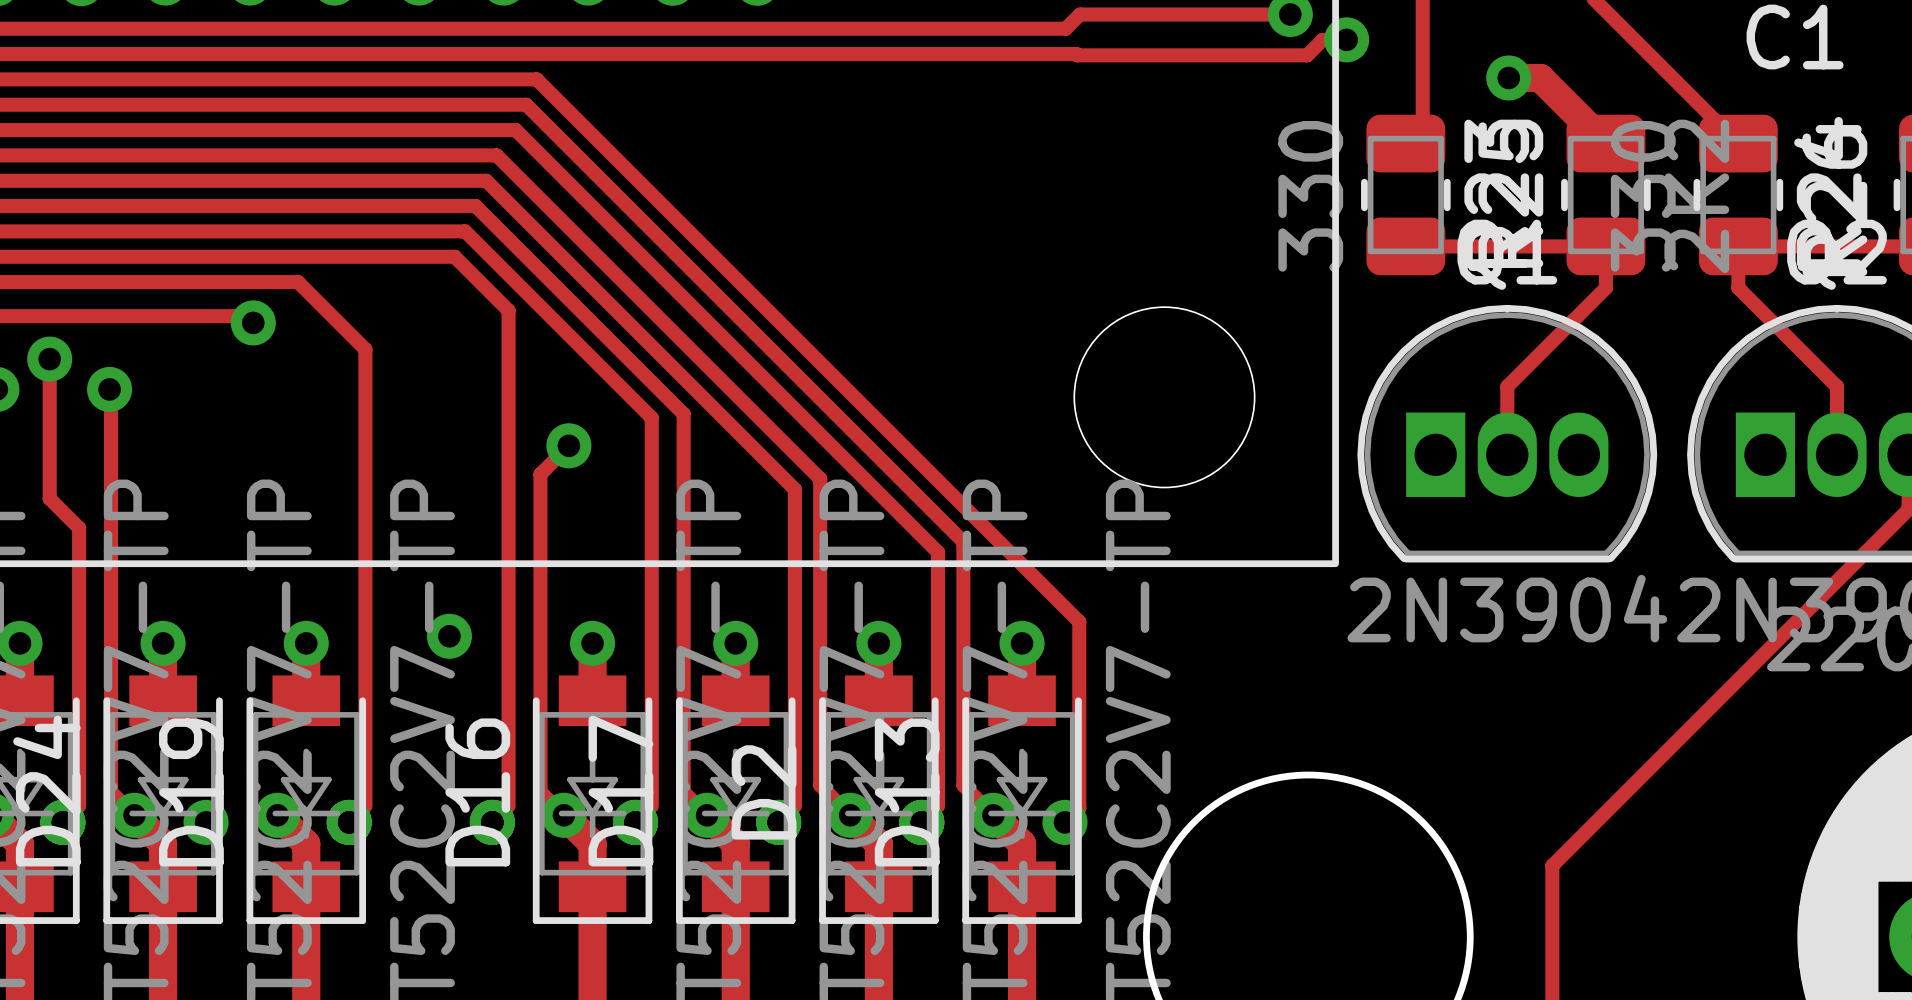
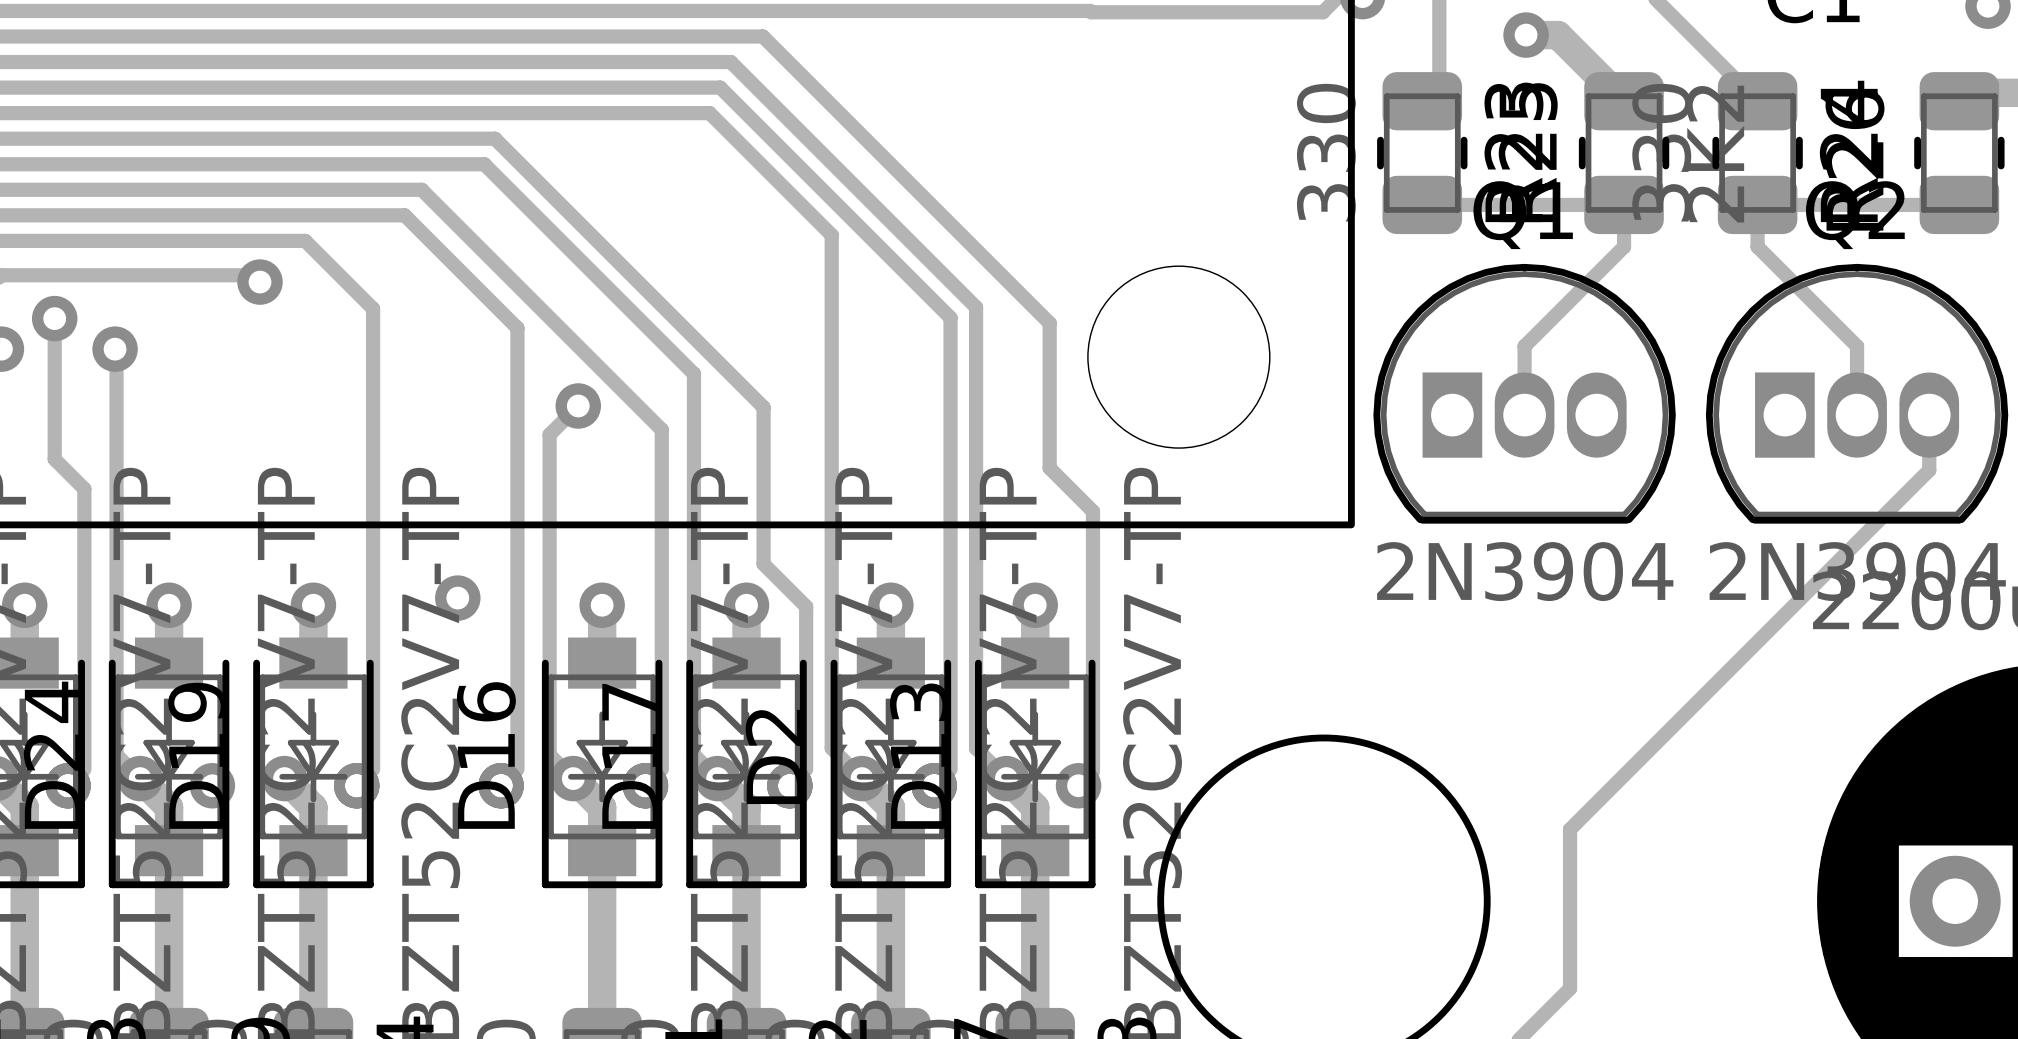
track: (536, 79) (1079, 621) -> (545, 36) (762, 36) (1049, 323) (1049, 468) (1092, 511) (1092, 583)
track: (526, 104) (963, 541) -> (535, 62) (730, 62) (976, 307) (976, 502)
track: (515, 130) (938, 552) -> (524, 87) (720, 87) (950, 317) (950, 513)
track: (496, 155) (820, 478) -> (505, 113) (709, 113) (831, 235) (831, 439)
track: (413, 231) (465, 231) (651, 417) (651, 469) -> (421, 189) (661, 429)
track: (396, 256) (454, 256) (508, 310) (508, 368) -> (404, 215) (517, 328)
track: (752, 447) (794, 489) (794, 644) -> (763, 407) (763, 564) (806, 606)

